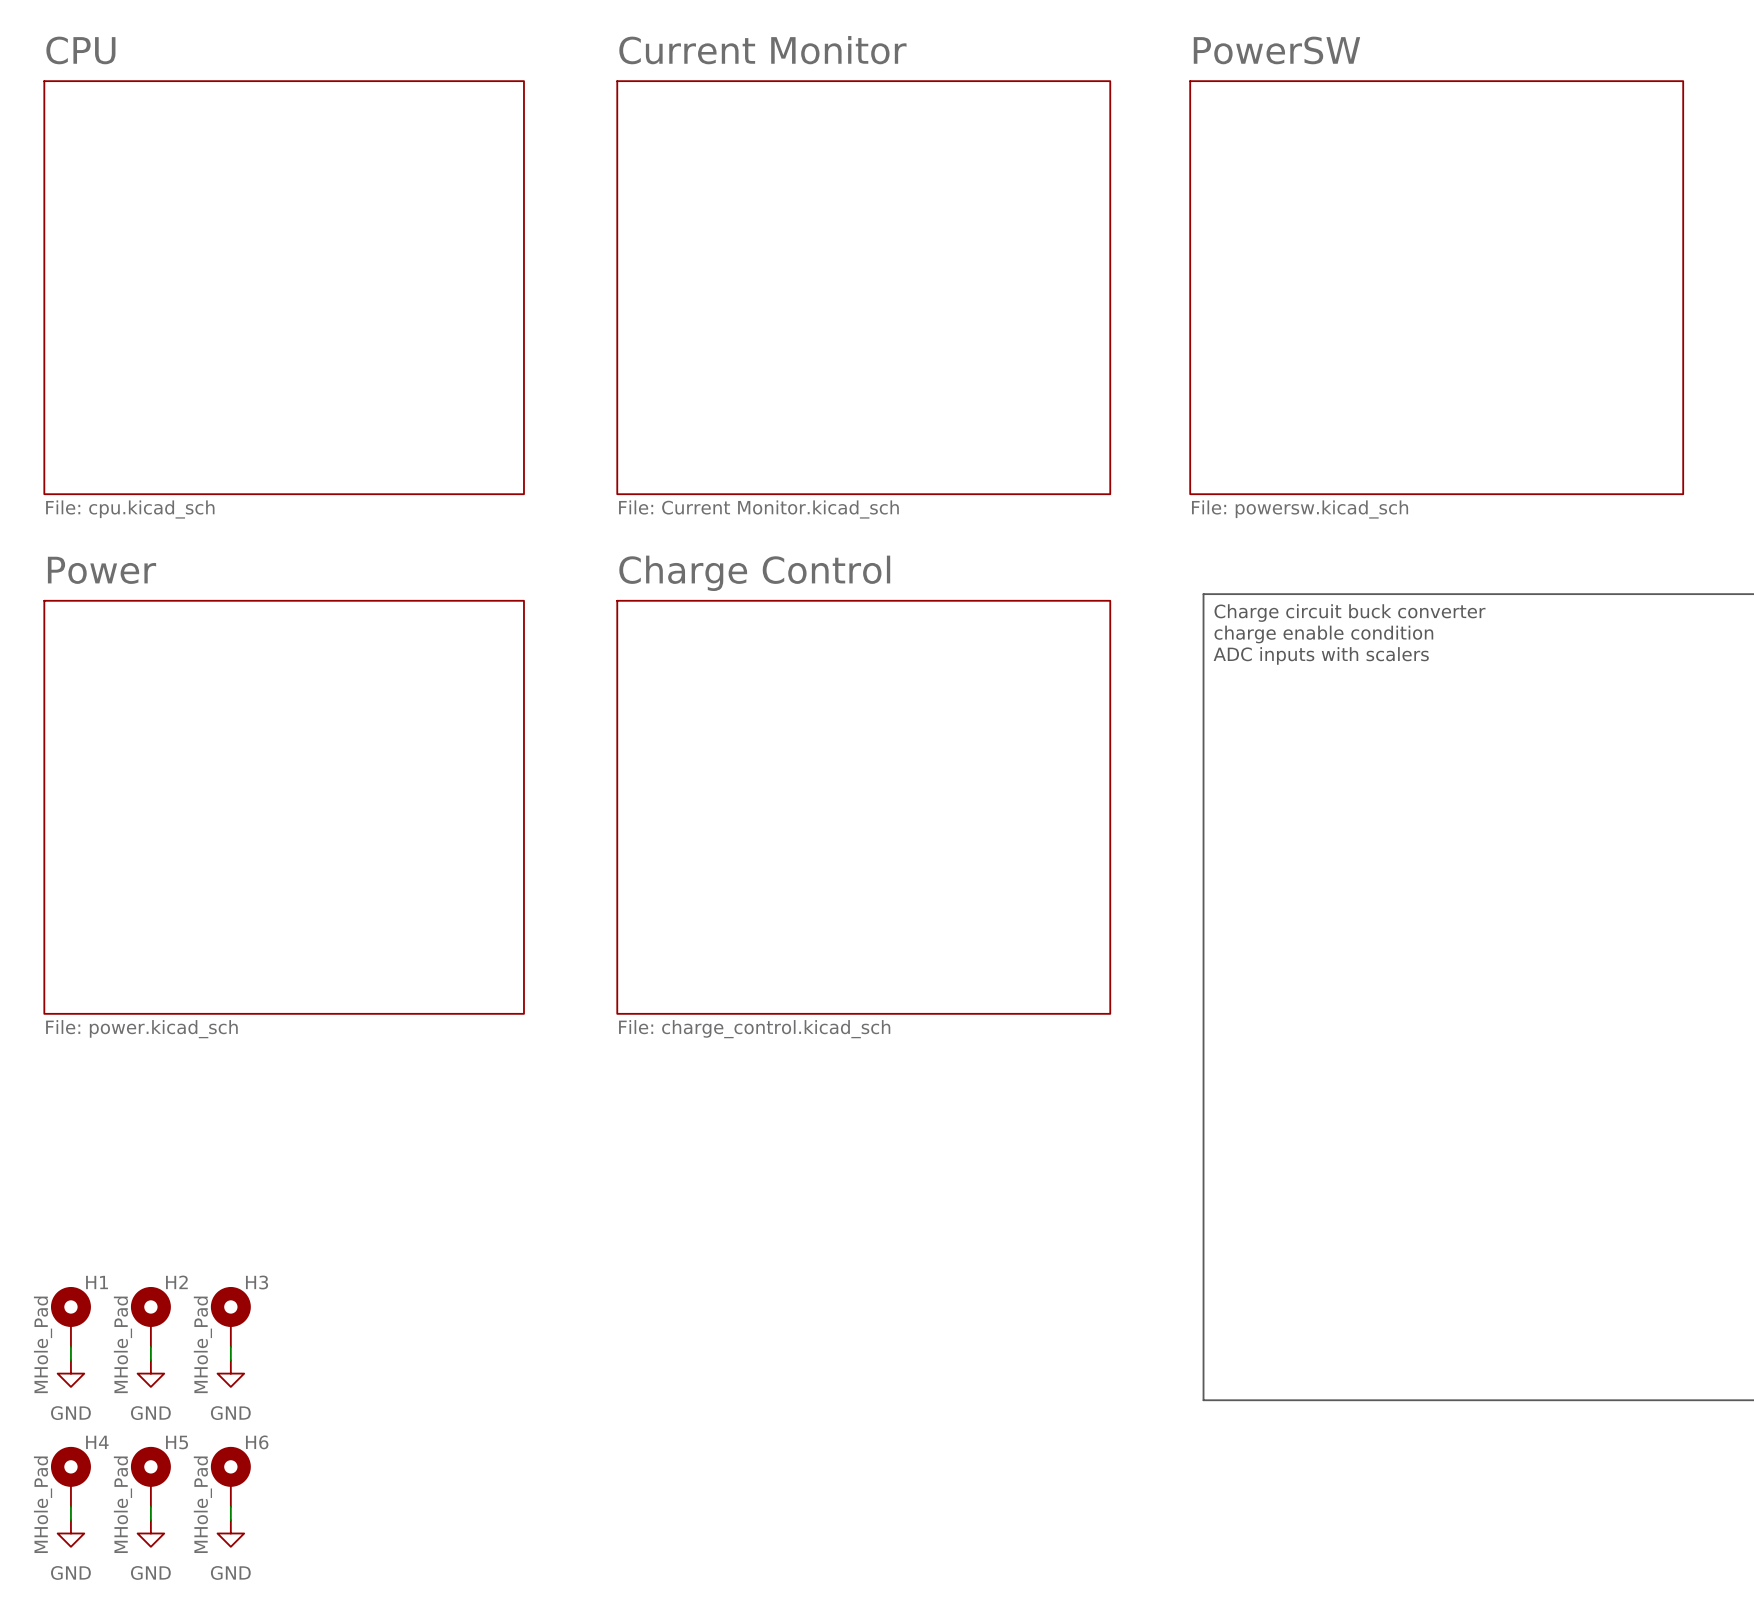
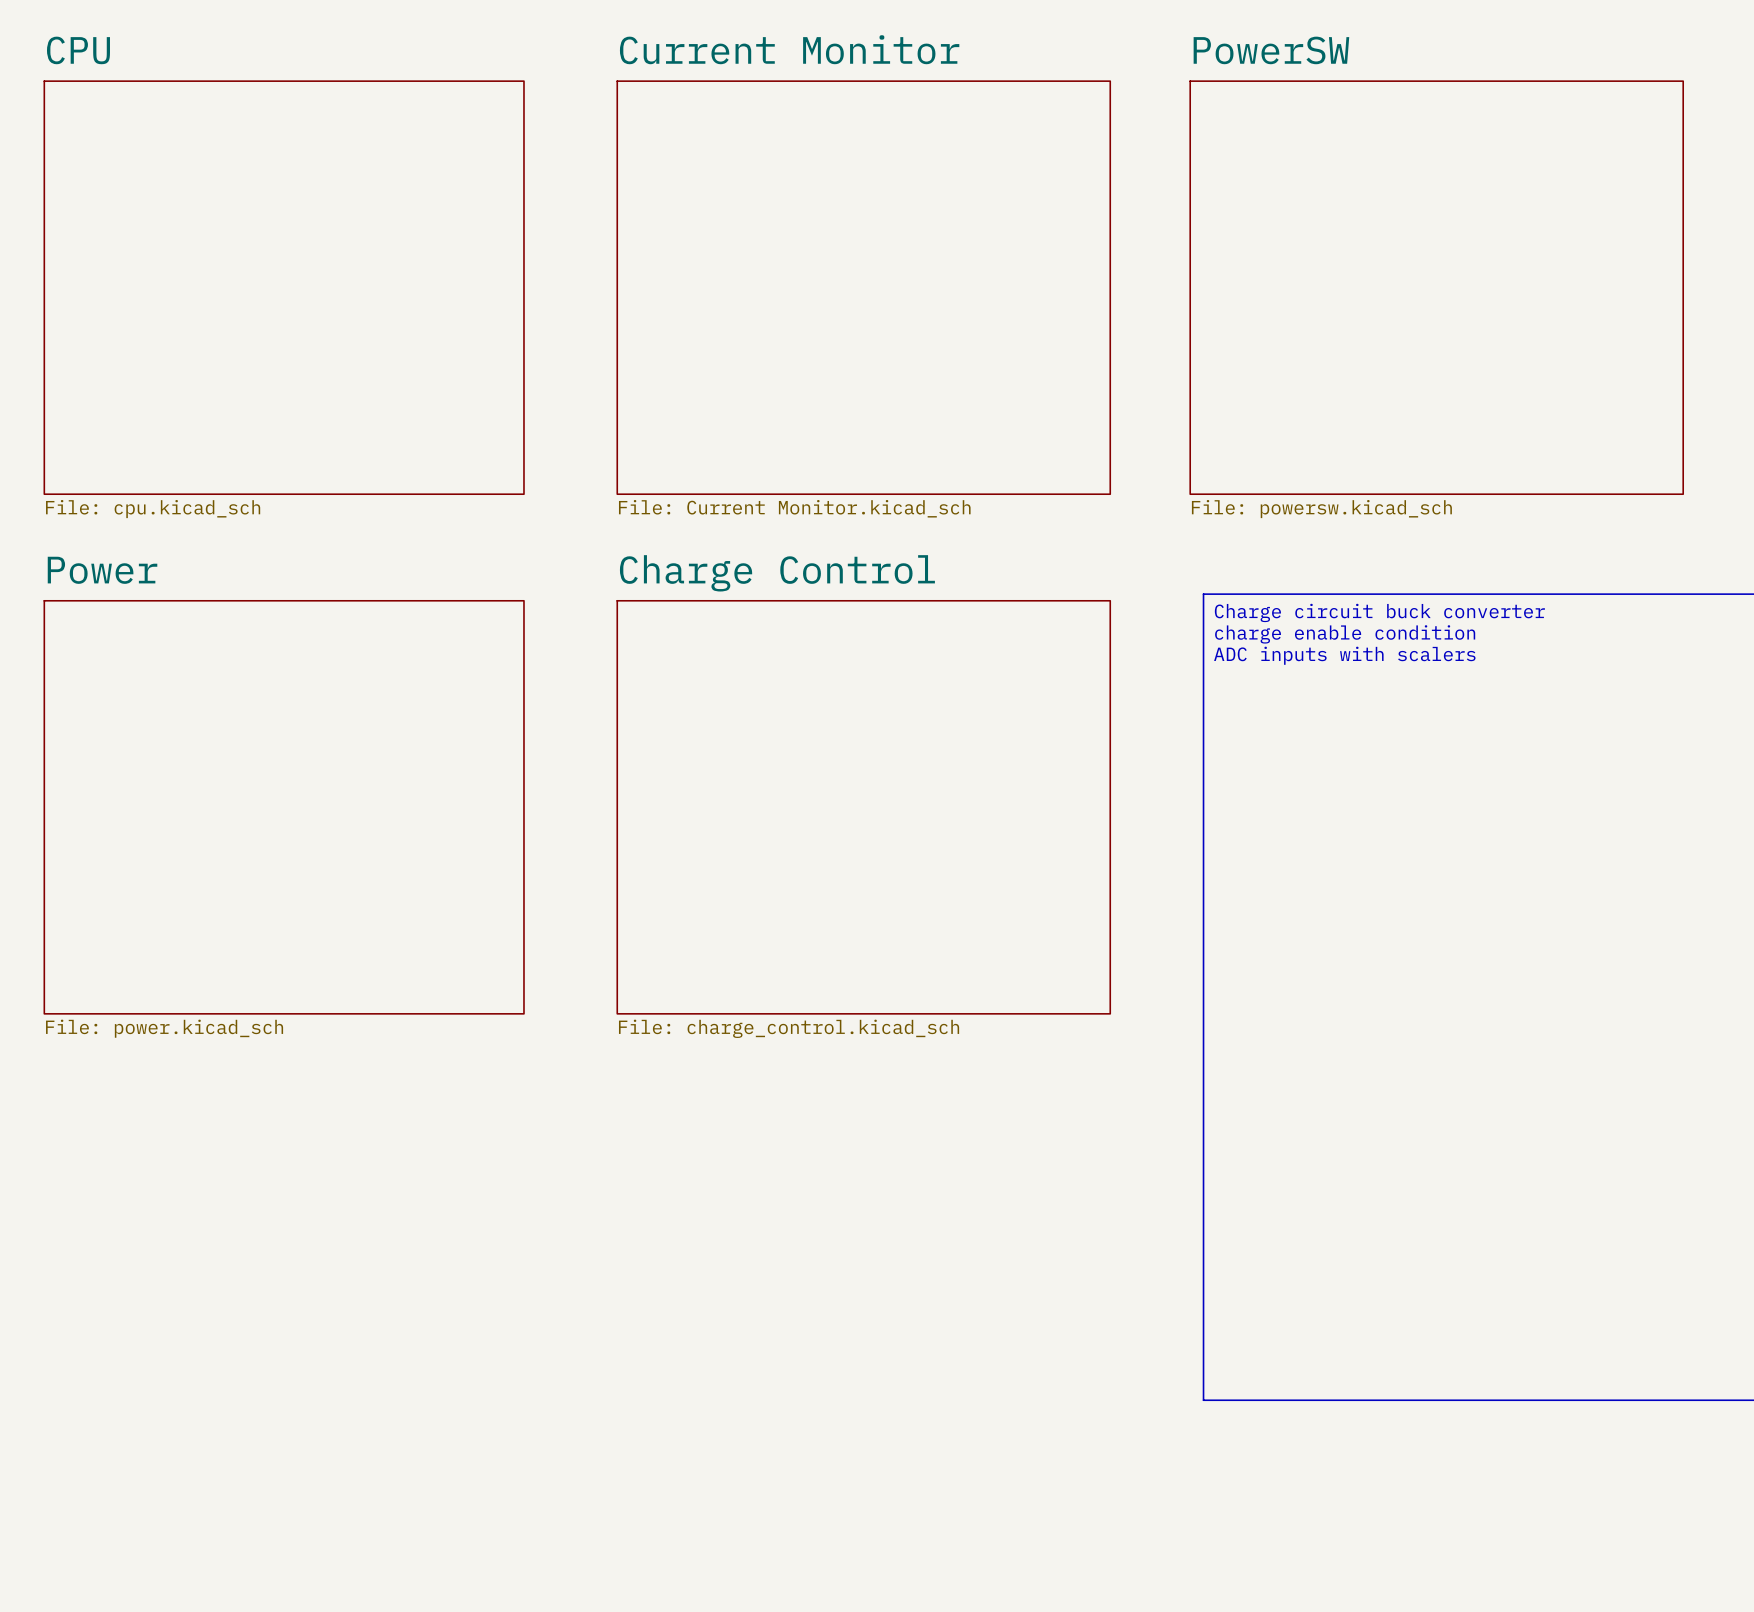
H1: MHole_Pad (70, 1316) -> none
H2: MHole_Pad (150, 1316) -> none
H3: MHole_Pad (230, 1316) -> none
wire: (70, 1346) (70, 1360) -> none
wire: (150, 1346) (150, 1360) -> none
wire: (230, 1346) (230, 1360) -> none
power symbol: GND (70, 1373) -> none
power symbol: GND (150, 1373) -> none
power symbol: GND (230, 1373) -> none
H4: MHole_Pad (70, 1476) -> none
H5: MHole_Pad (150, 1476) -> none
H6: MHole_Pad (230, 1476) -> none
wire: (70, 1506) (70, 1520) -> none
wire: (150, 1506) (150, 1520) -> none
wire: (230, 1506) (230, 1520) -> none
power symbol: GND (70, 1533) -> none
power symbol: GND (150, 1533) -> none
power symbol: GND (230, 1533) -> none

